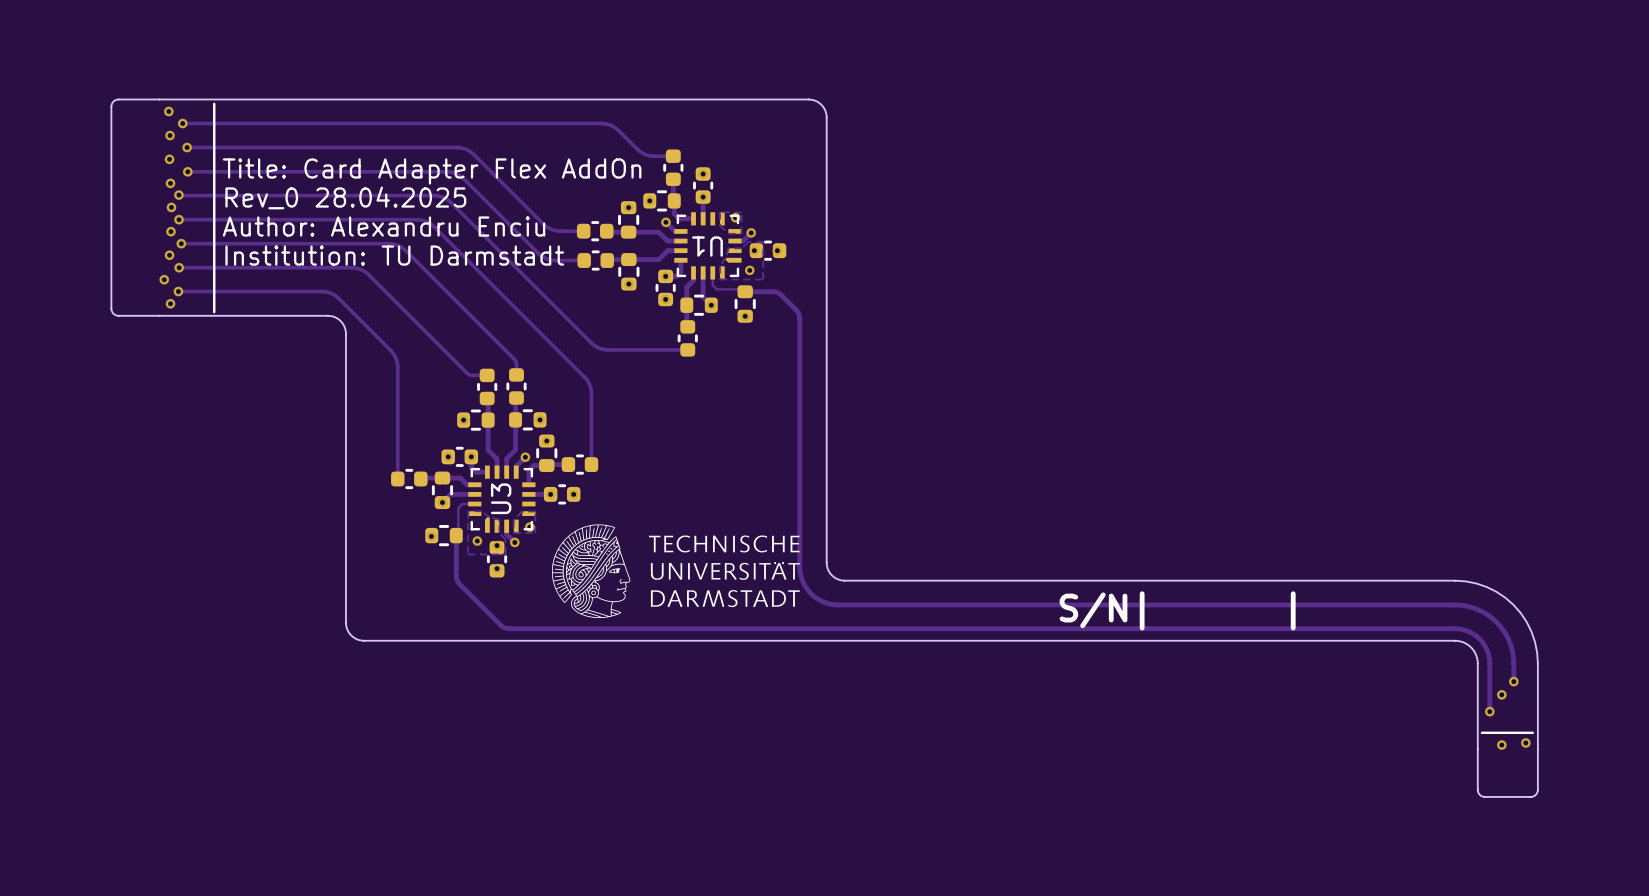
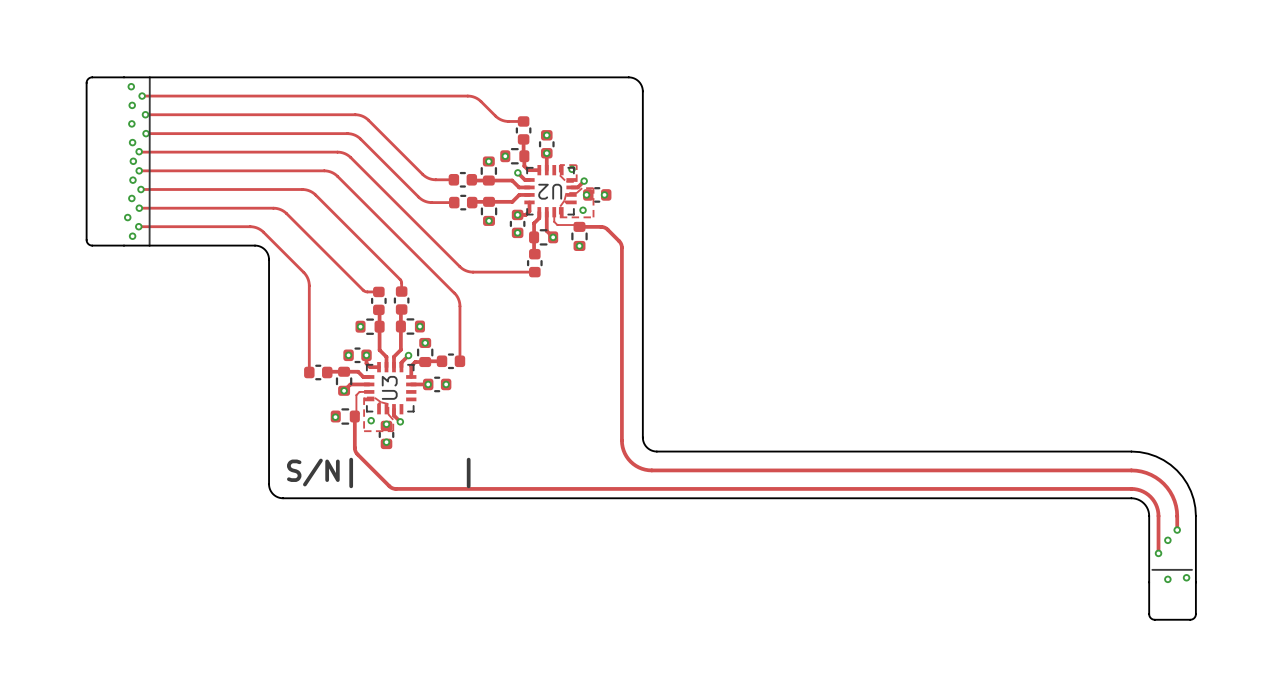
line: none -> (149, 77) (149, 245)
line: (214, 103) (214, 312) -> none
text: Title: Card Adapter Flex AddOn (432, 171) -> none
text: Rev_0 28.04.2025 (345, 197) -> none
text: Author: Alexandru Enciu (384, 226) -> none
U1 name: U1 (707, 246) -> U2 (550, 191)
text: Institution: TU Darmstadt (394, 255) -> none
zone outline: (522, 511) (535, 511) (535, 533) (513, 533) (513, 519) (522, 511) -> none
drawing: [551, 524, 800, 619] -> none
via: (529, 527) -> none
text: none -> S/N| | (378, 472)
text: S/N| | (1177, 610) -> none

